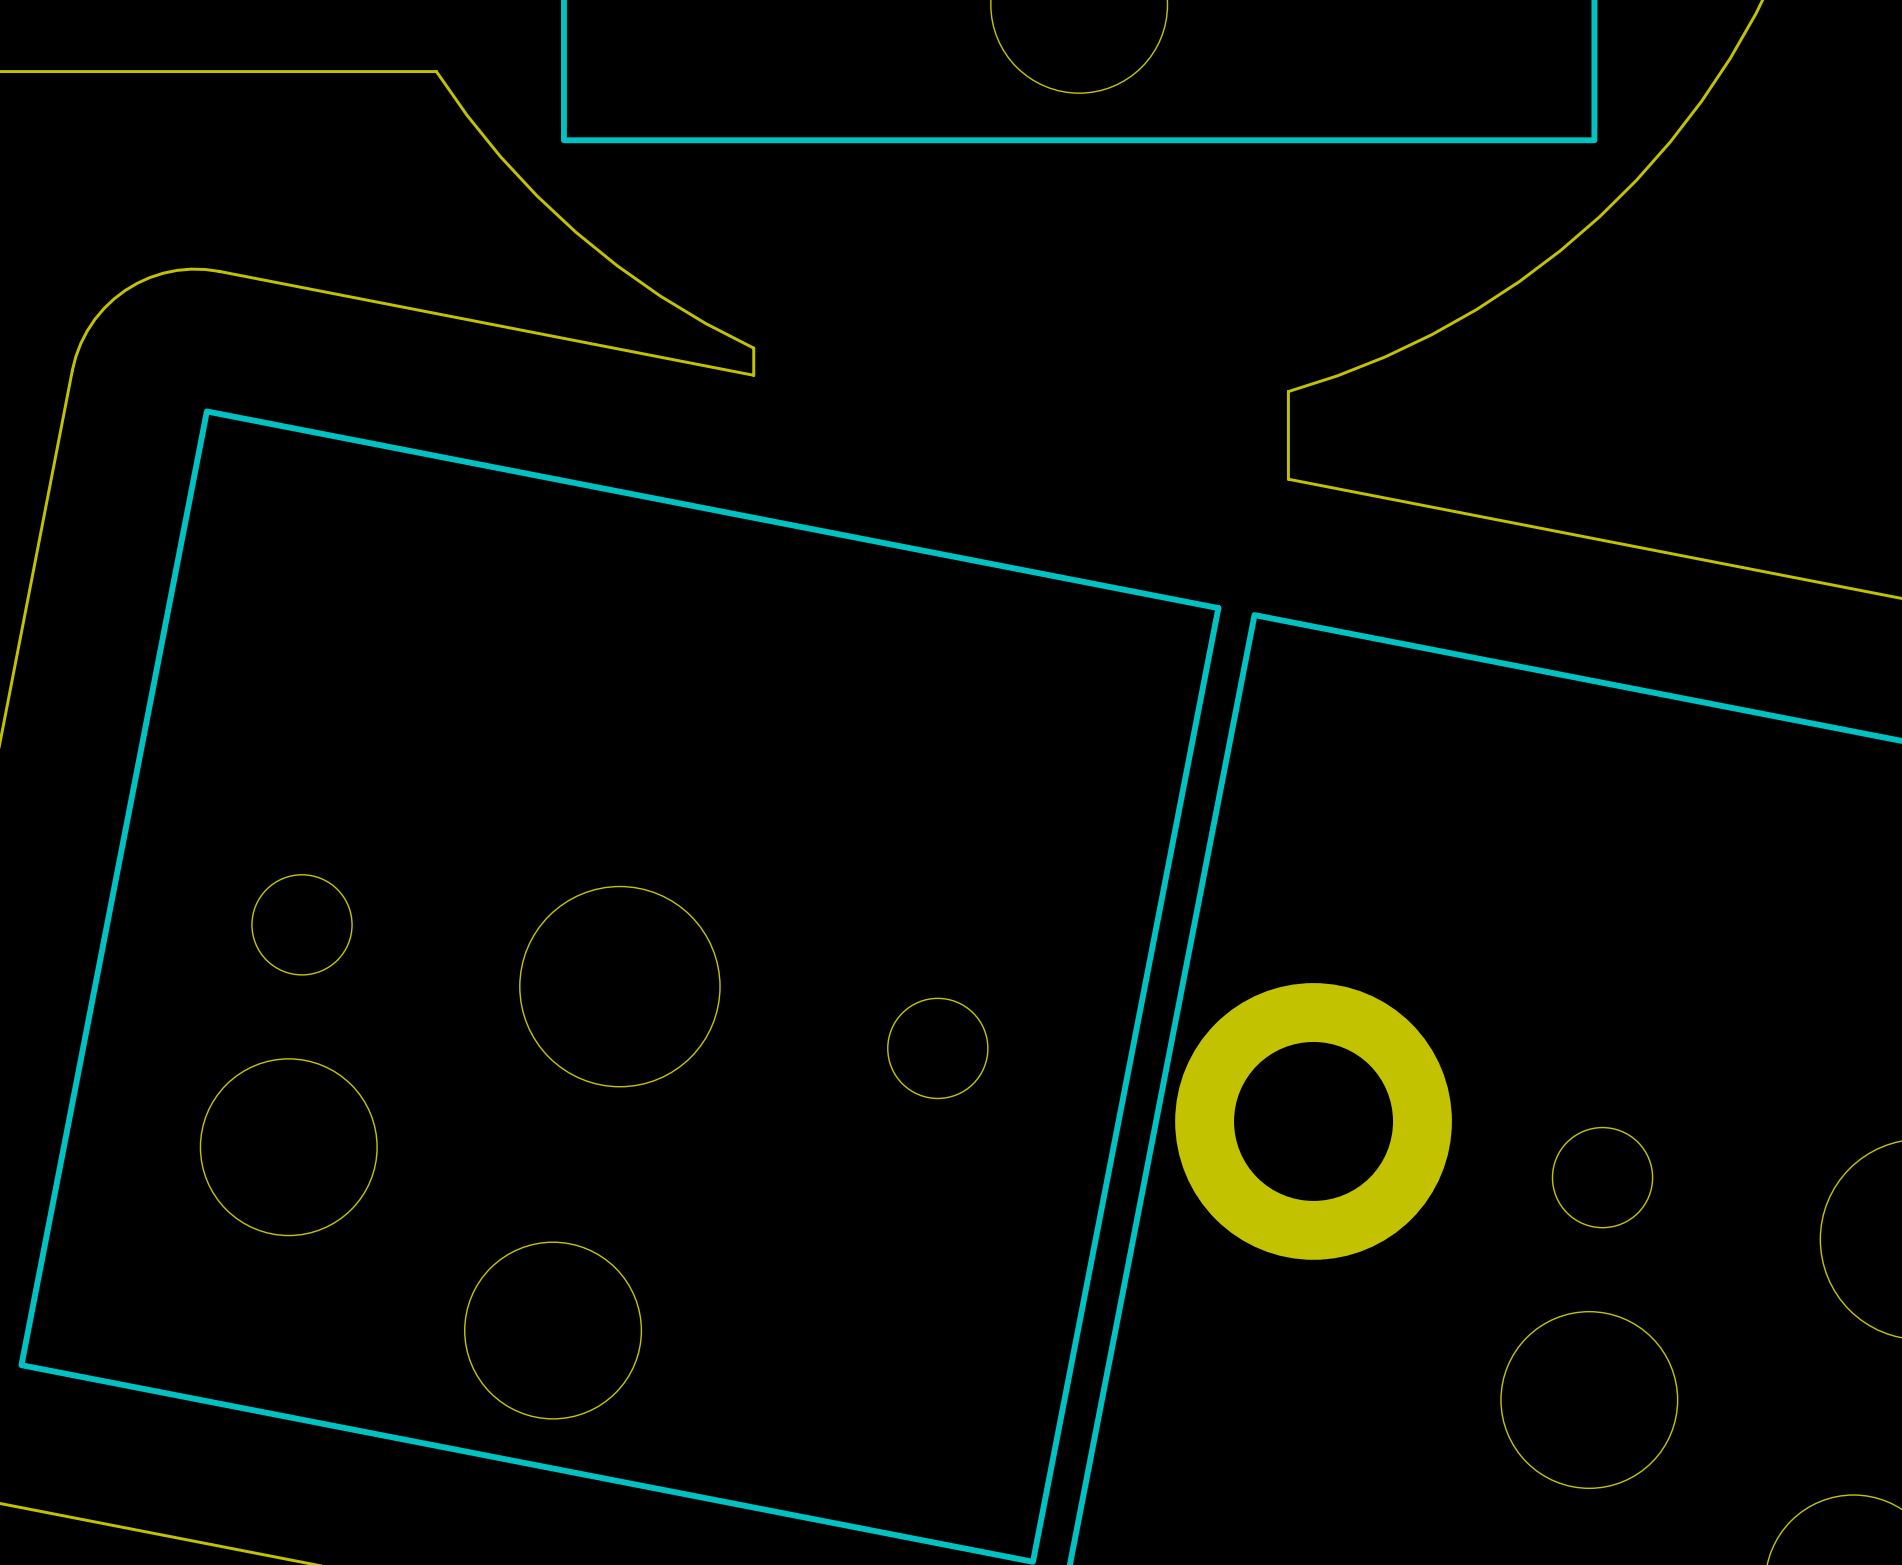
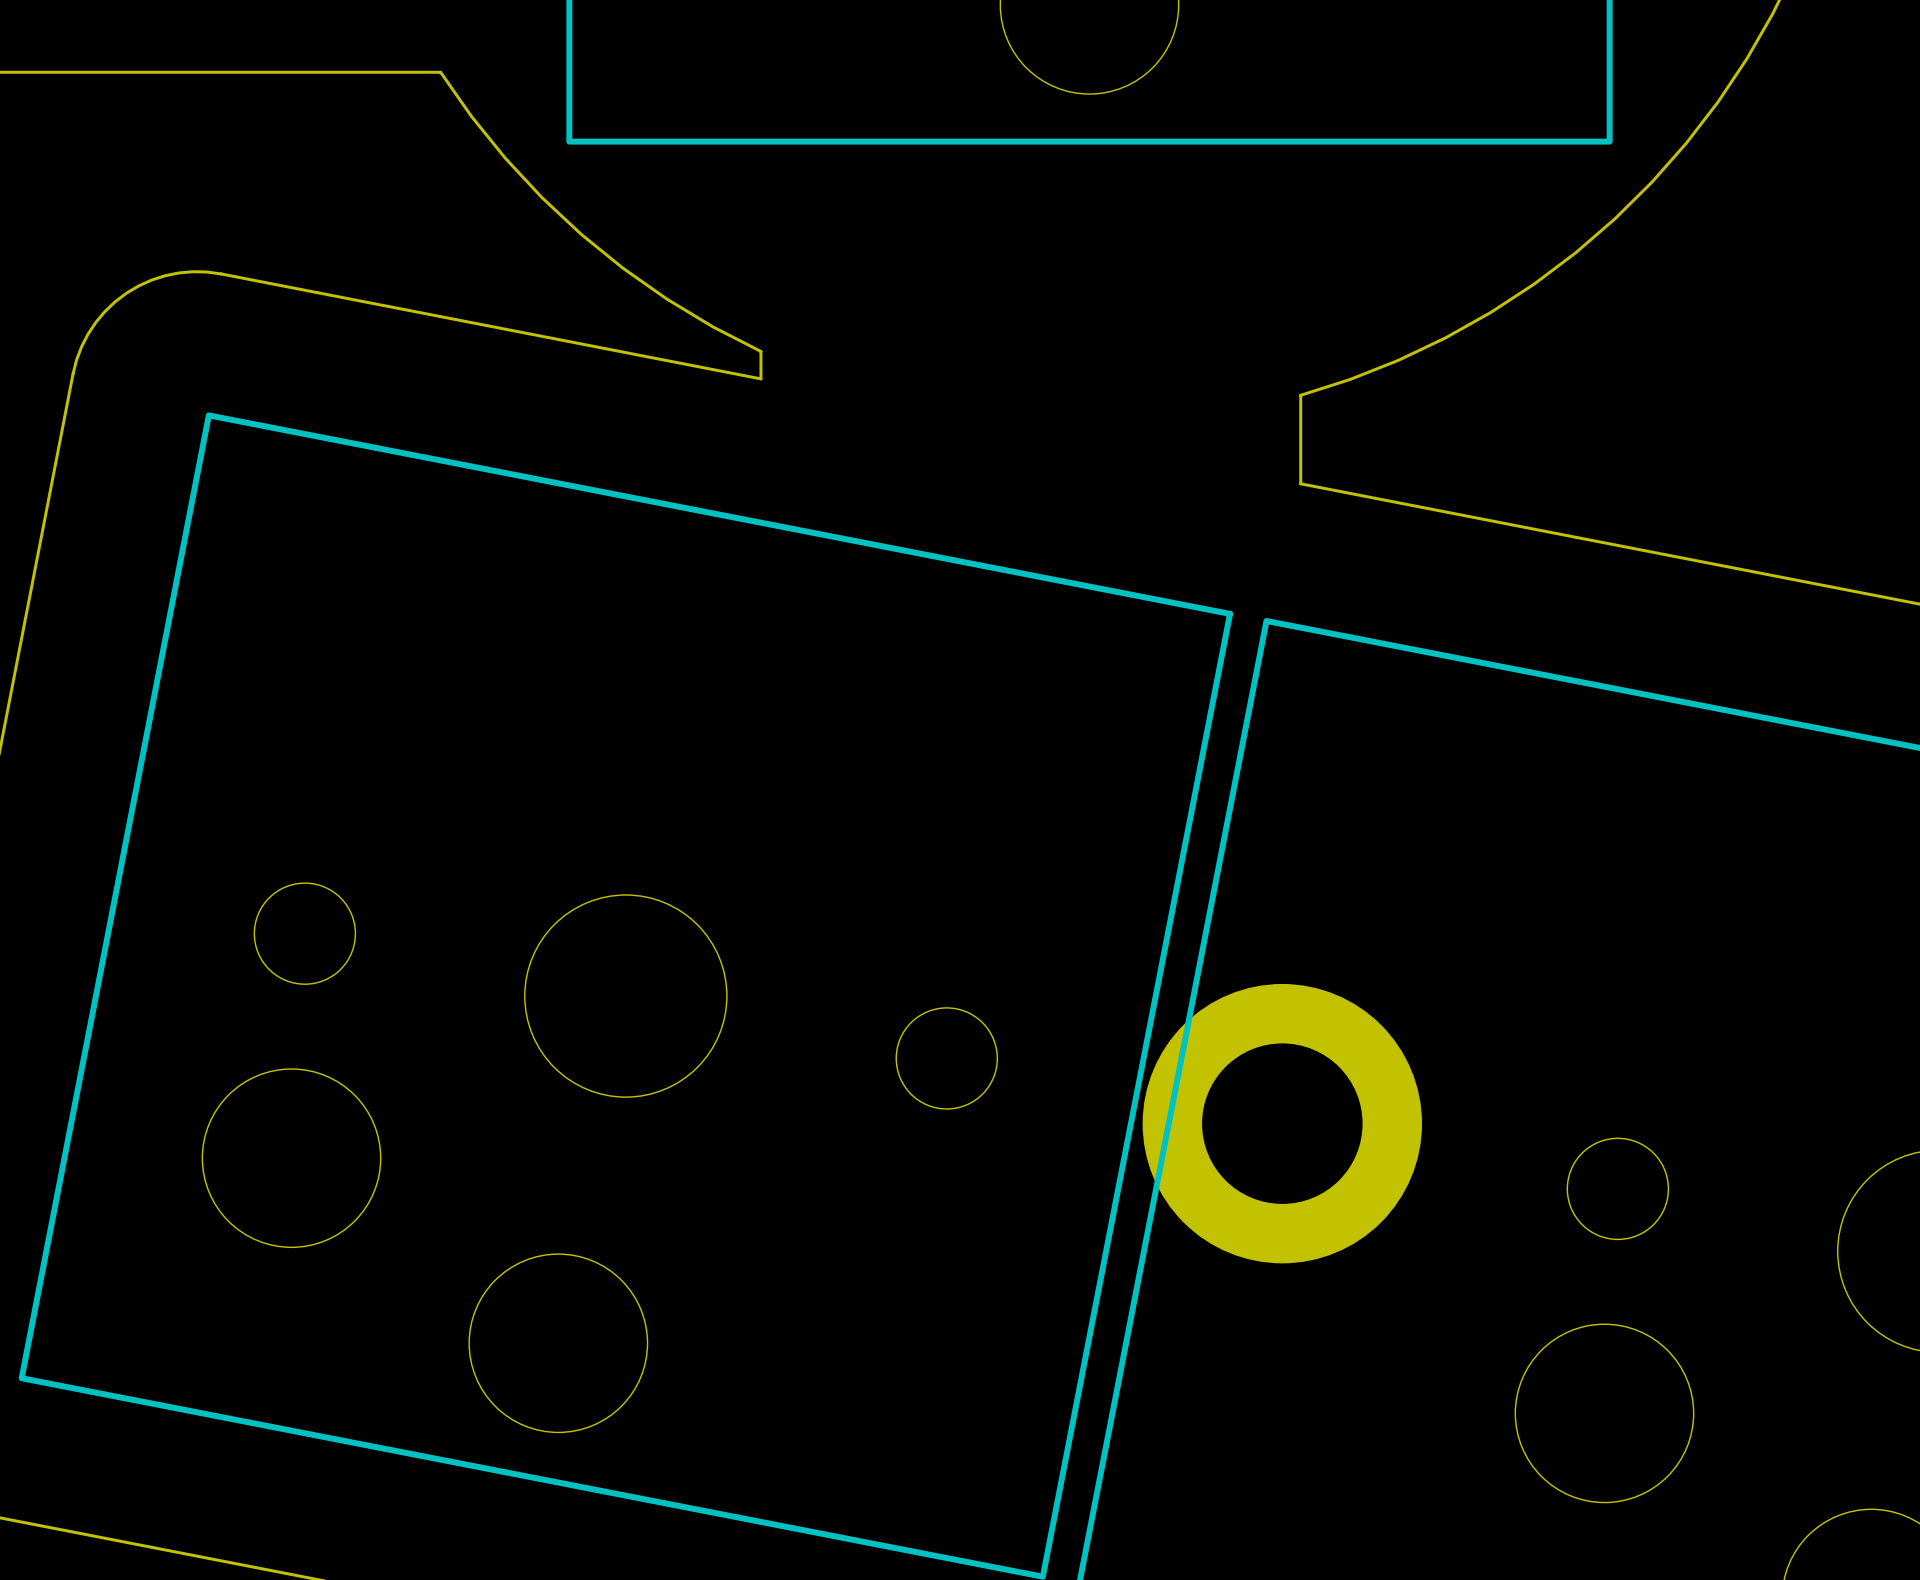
part position: (1313, 1121) -> (1282, 1123)

